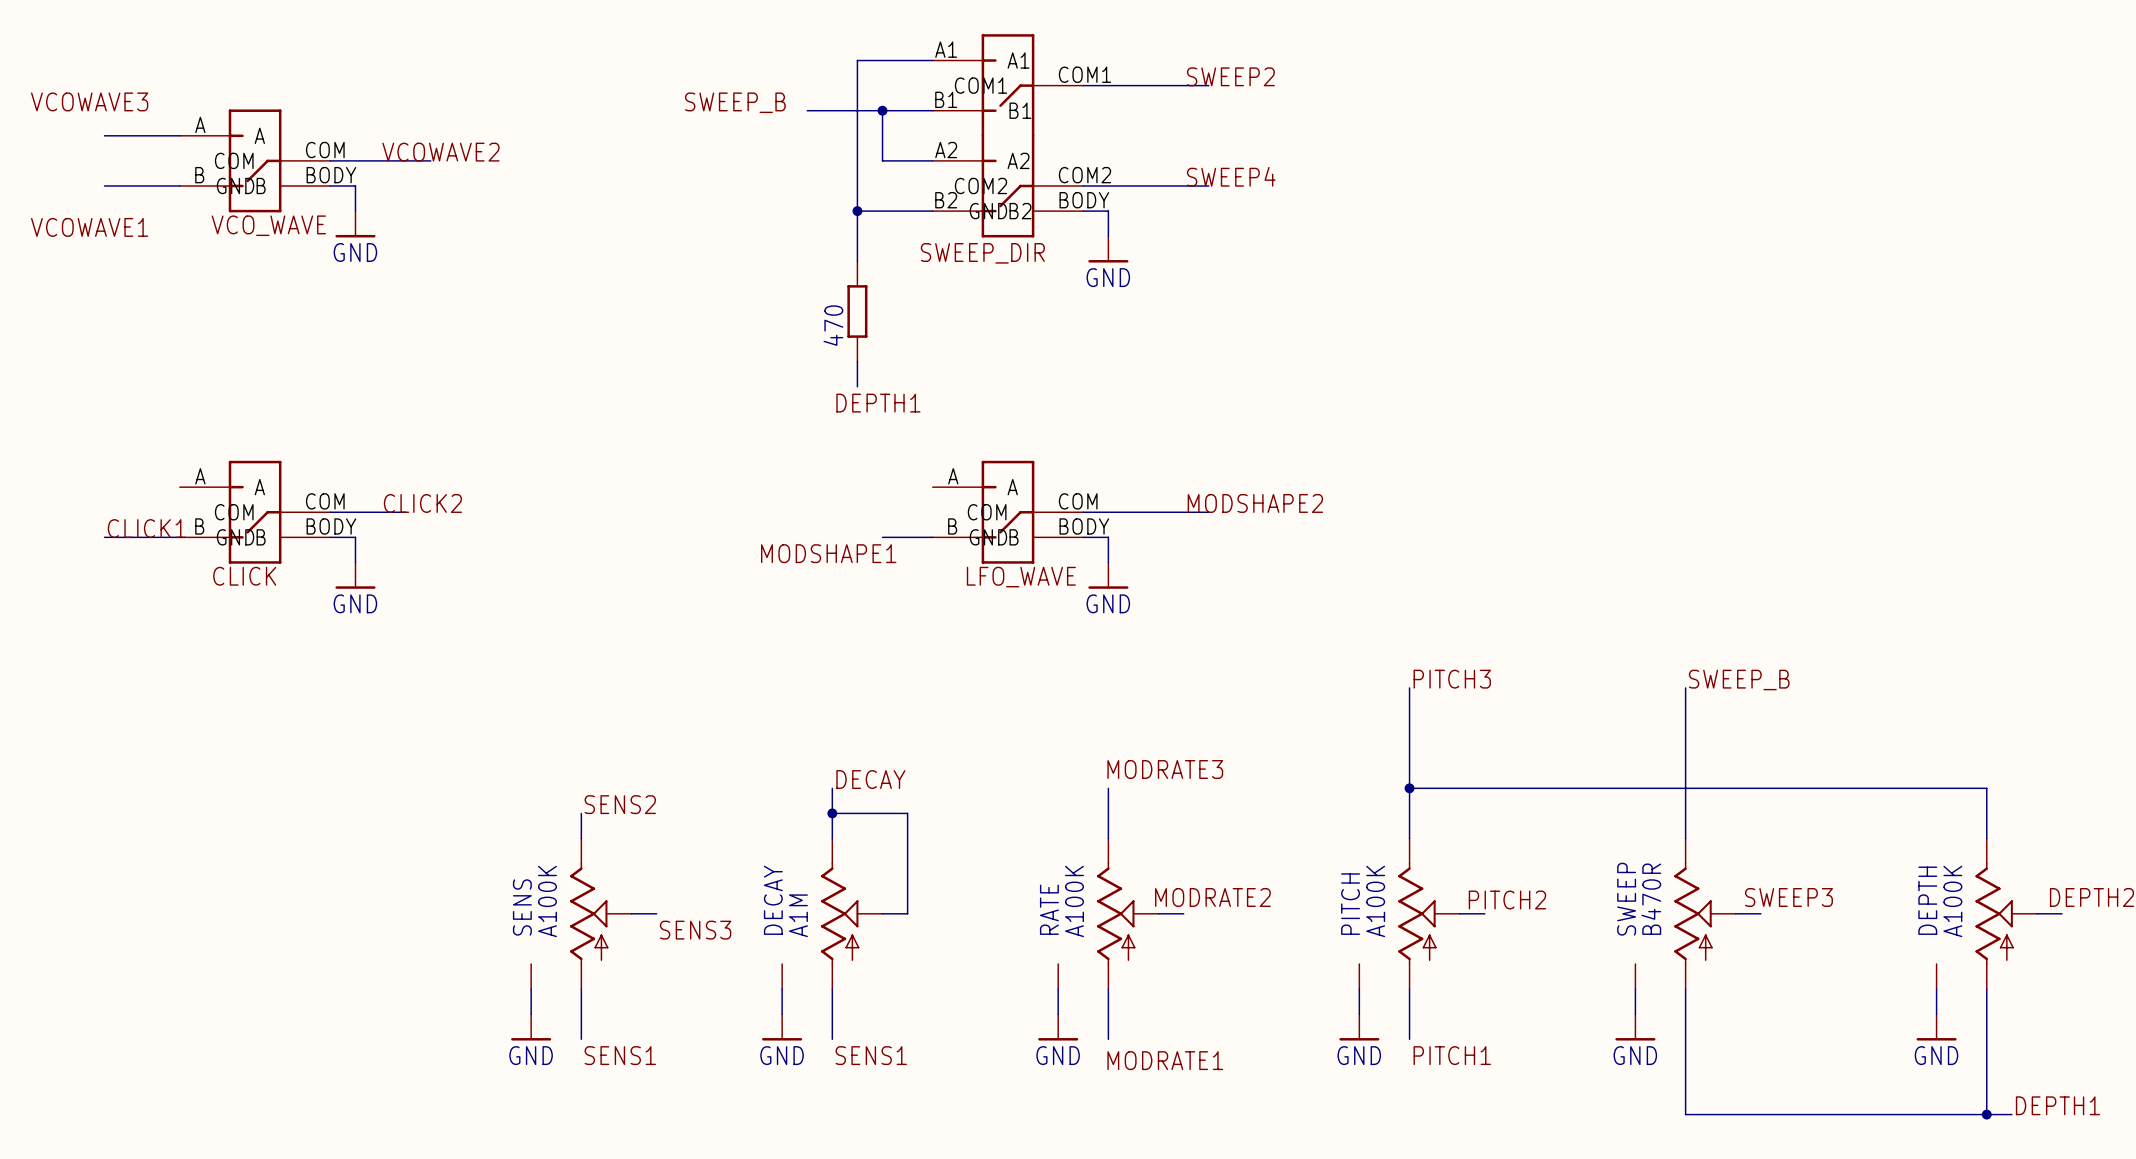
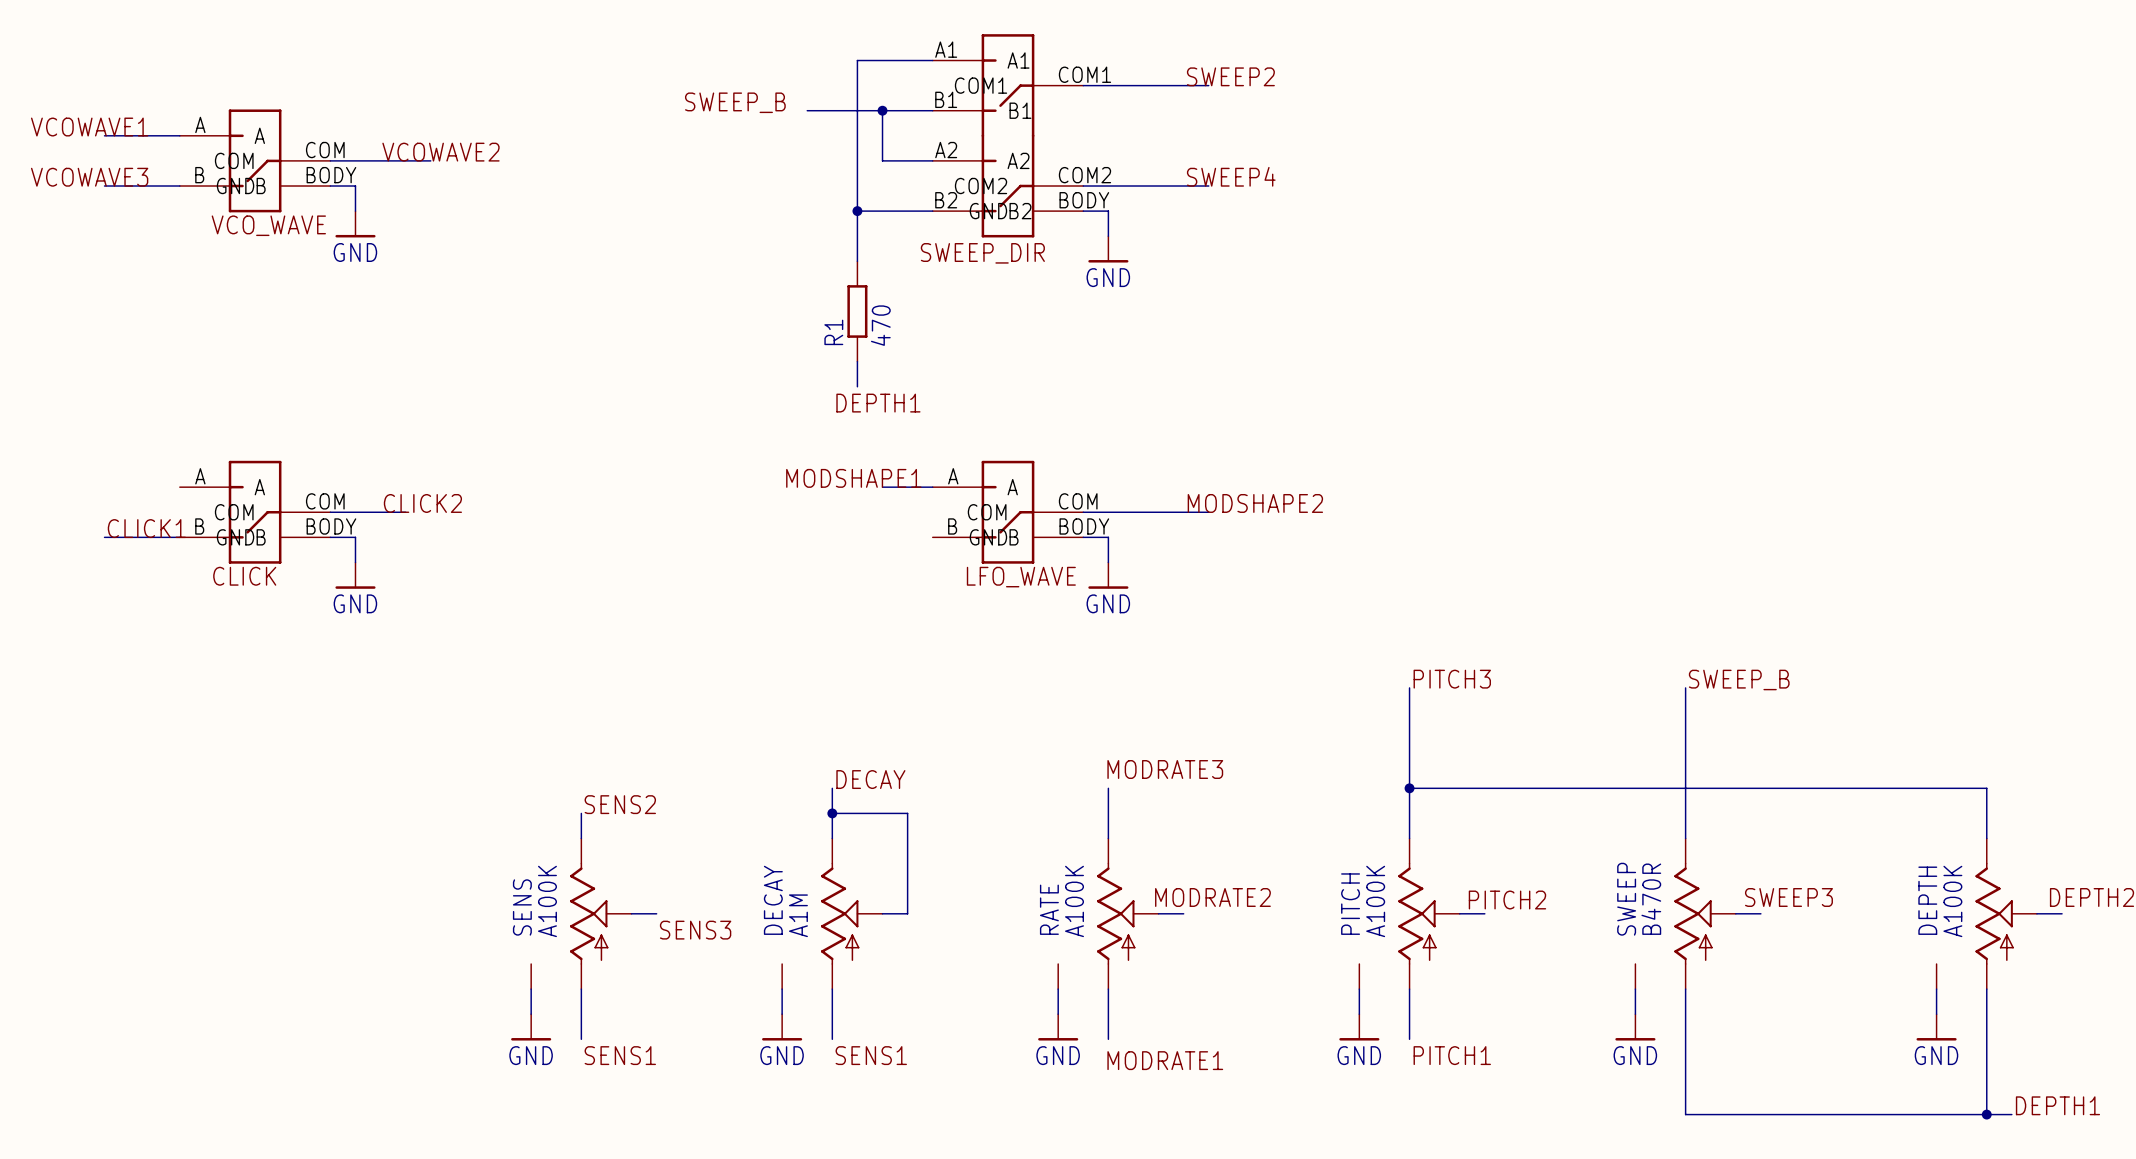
label position: VCOWAVE3 (89, 101) -> VCOWAVE3 (89, 177)
label position: VCOWAVE1 (89, 227) -> VCOWAVE1 (89, 127)
470 name: 470 (833, 325) -> R1 (833, 332)
470 value: none -> 470 (880, 325)
wire: (882, 537) (932, 537) -> (882, 487) (932, 487)
label position: MODSHAPE1 (828, 553) -> MODSHAPE1 (853, 478)

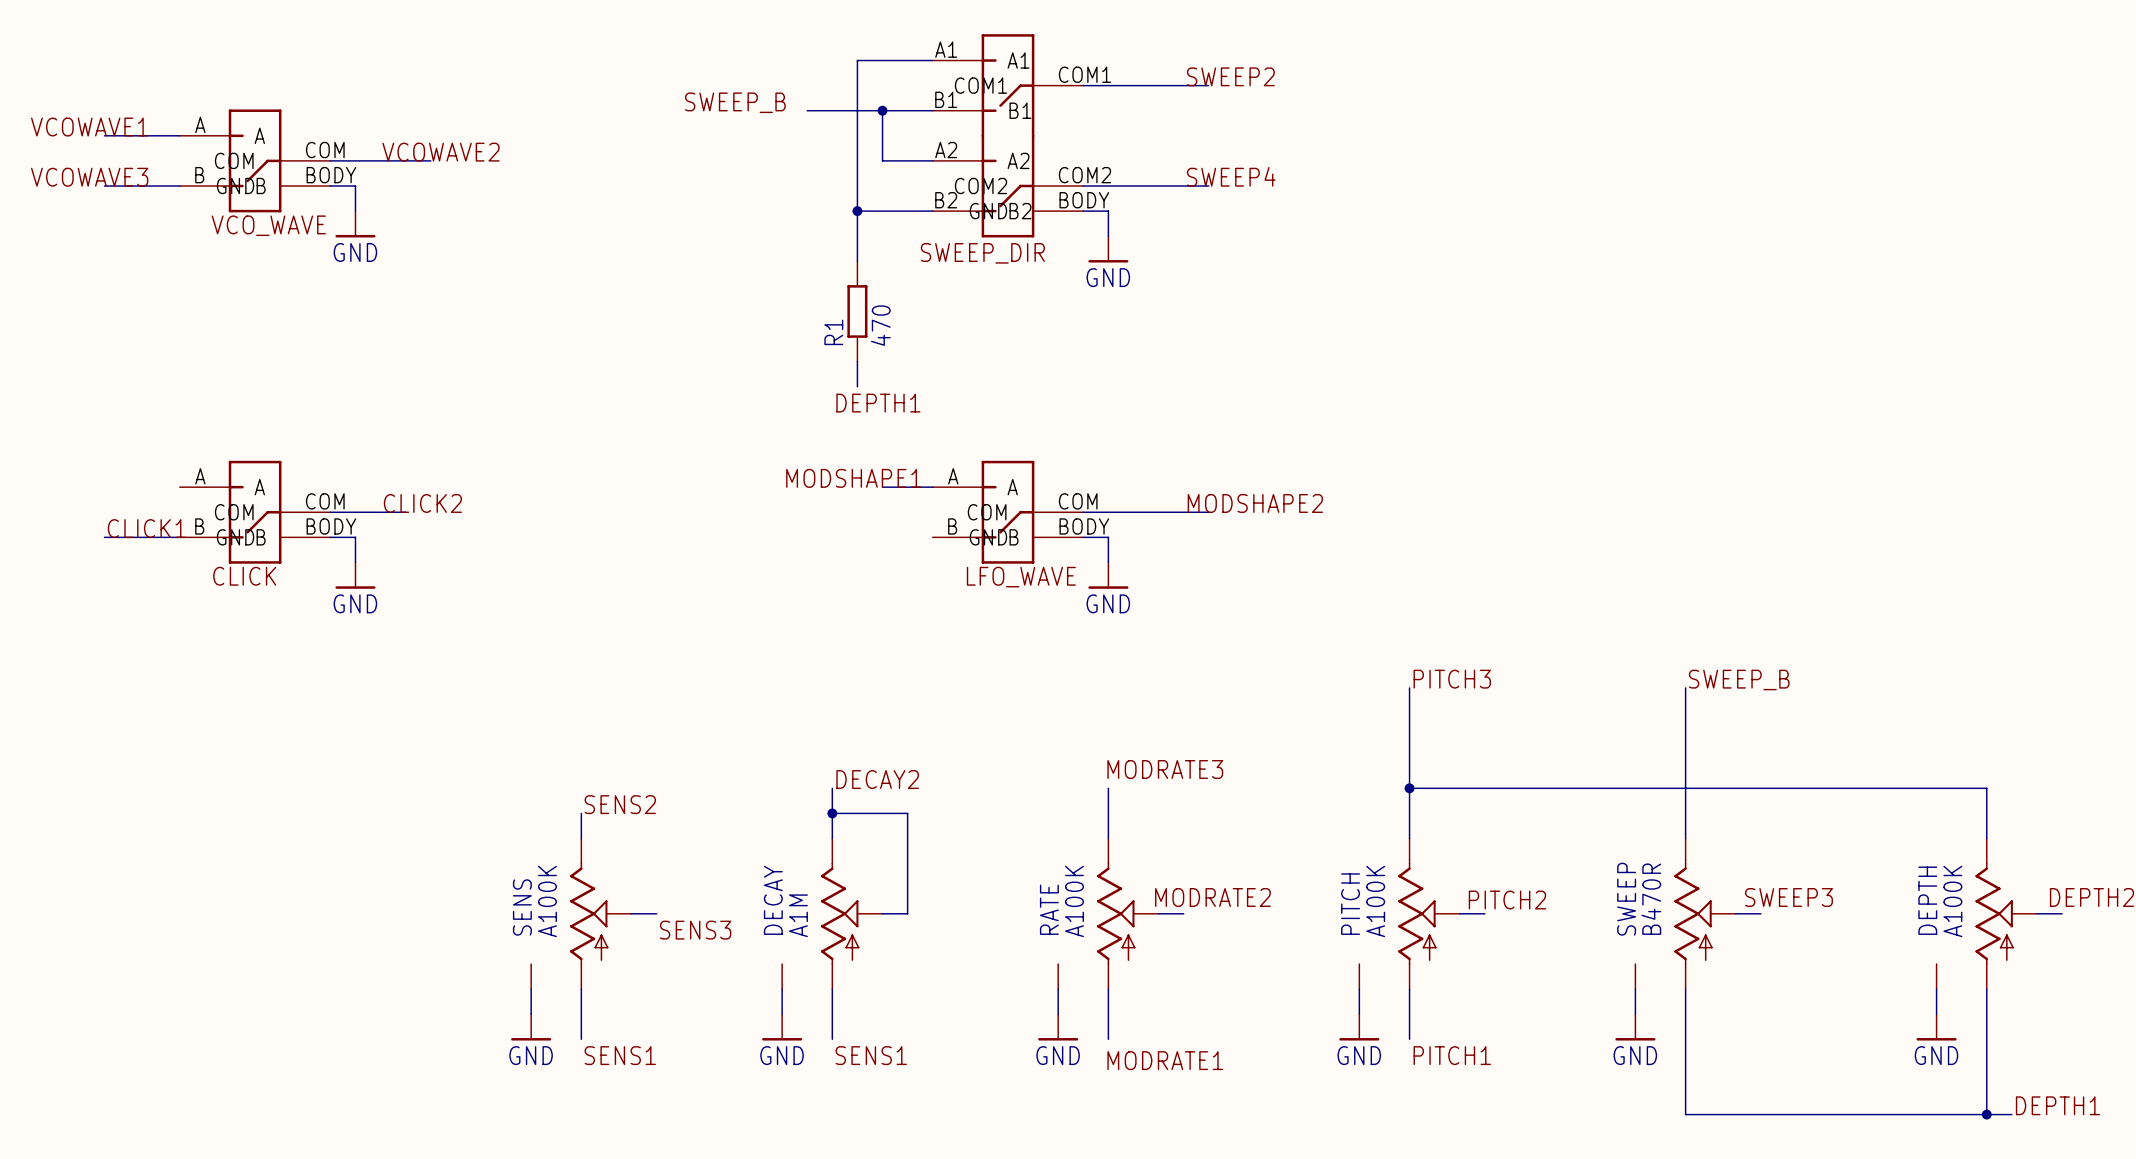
label: DECAY (870, 779) -> DECAY2 (877, 779)

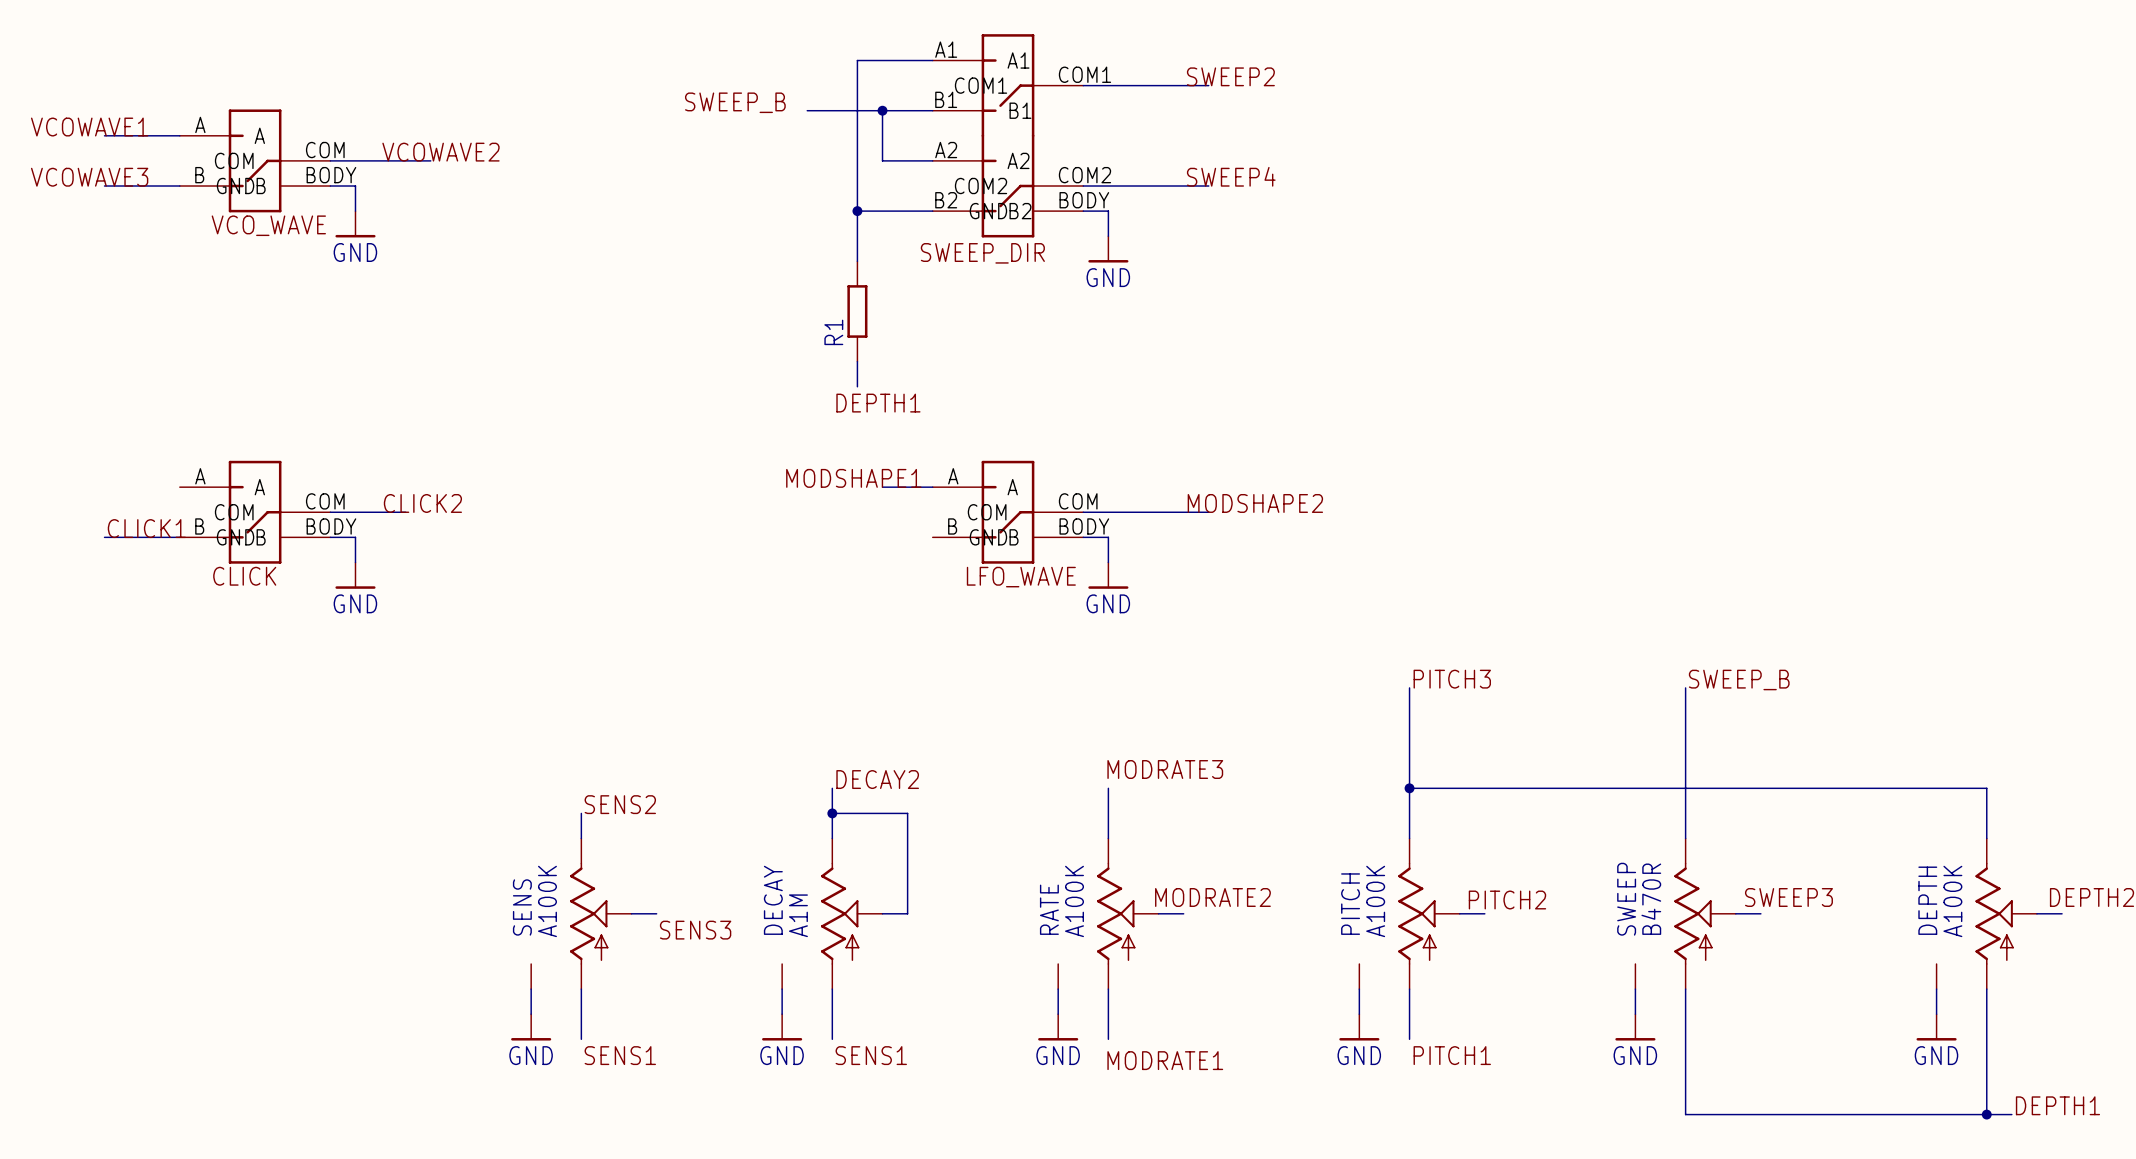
R1 value: 470 (880, 325) -> none

